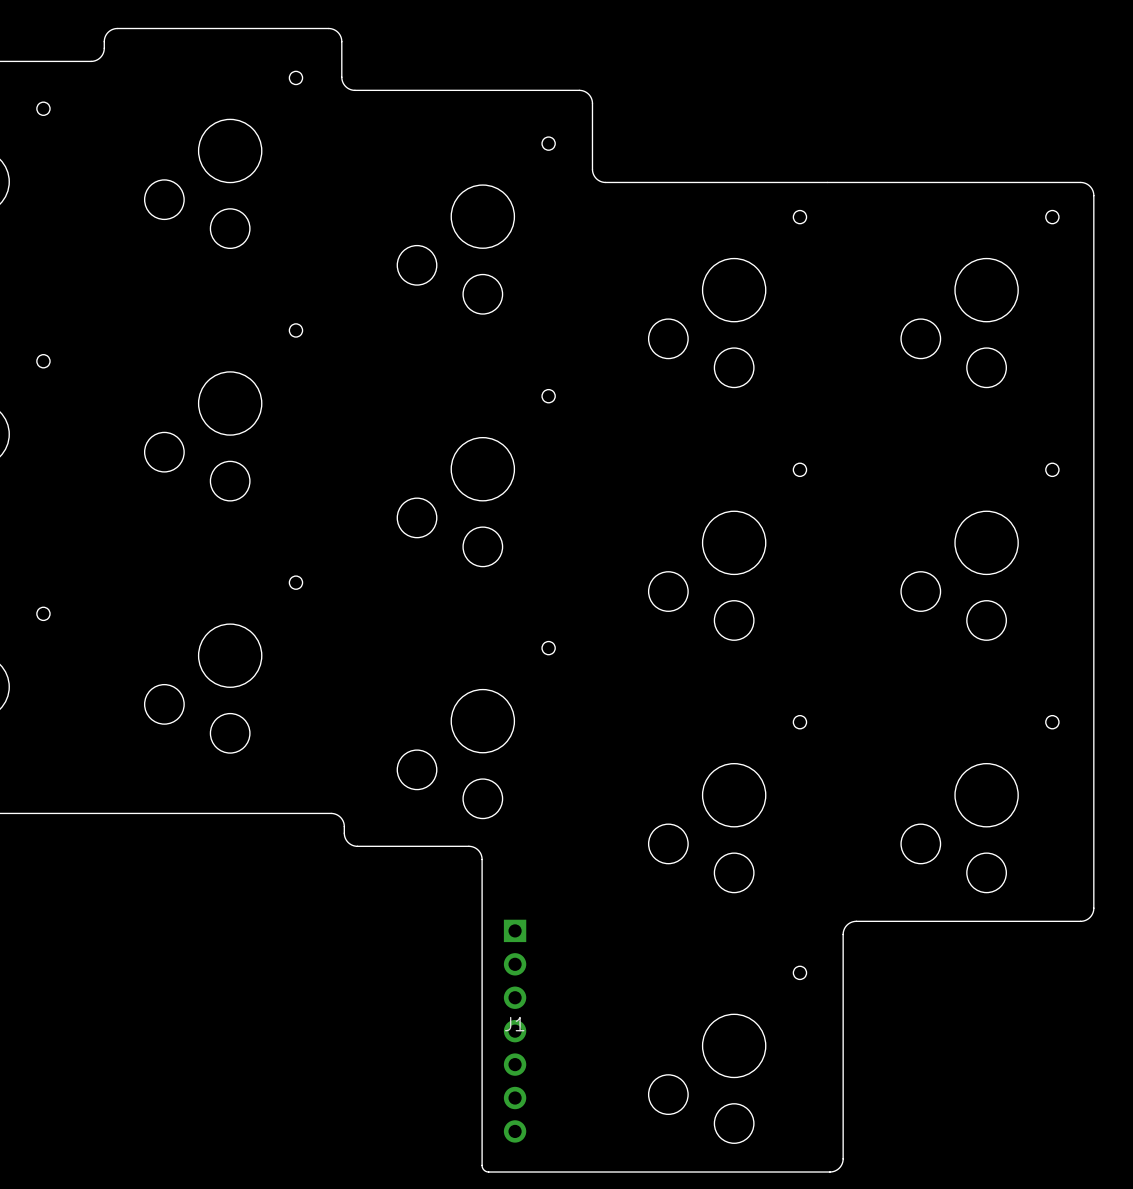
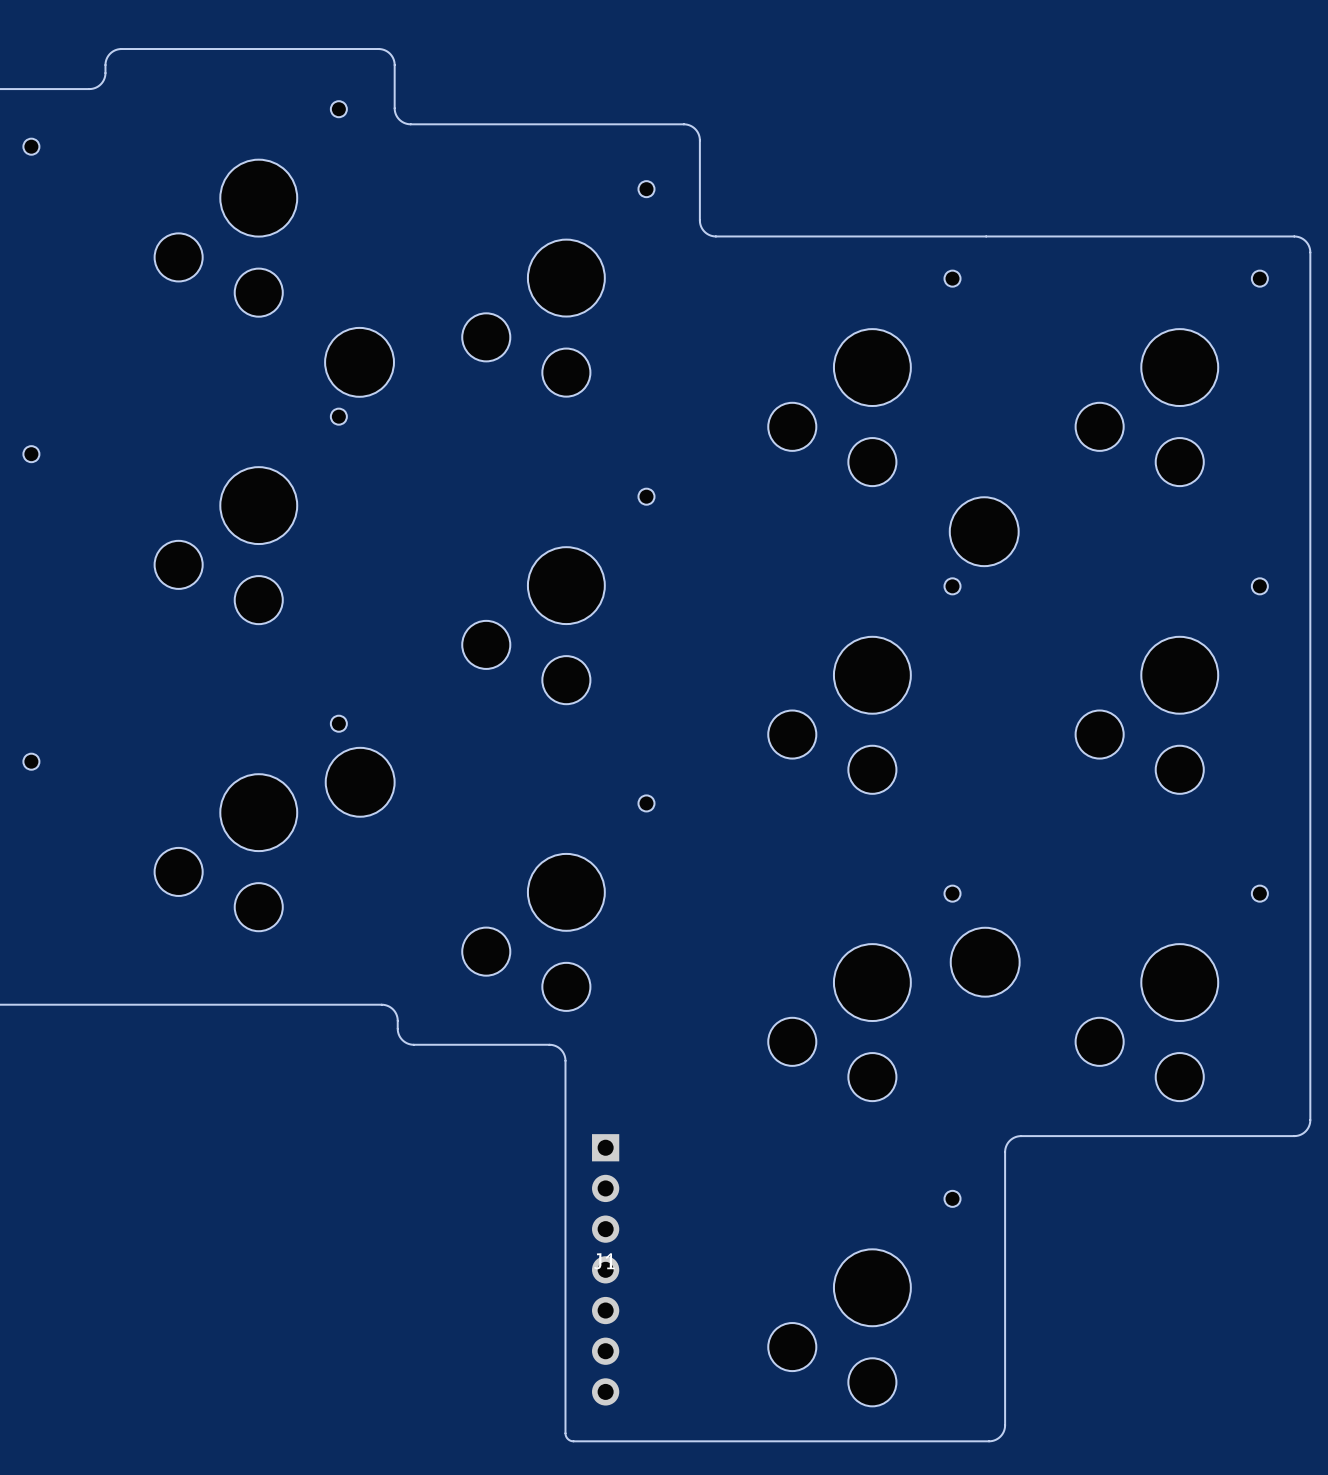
part: none -> (359, 362)
part: none -> (984, 531)
part: none -> (360, 782)
part: none -> (985, 962)

